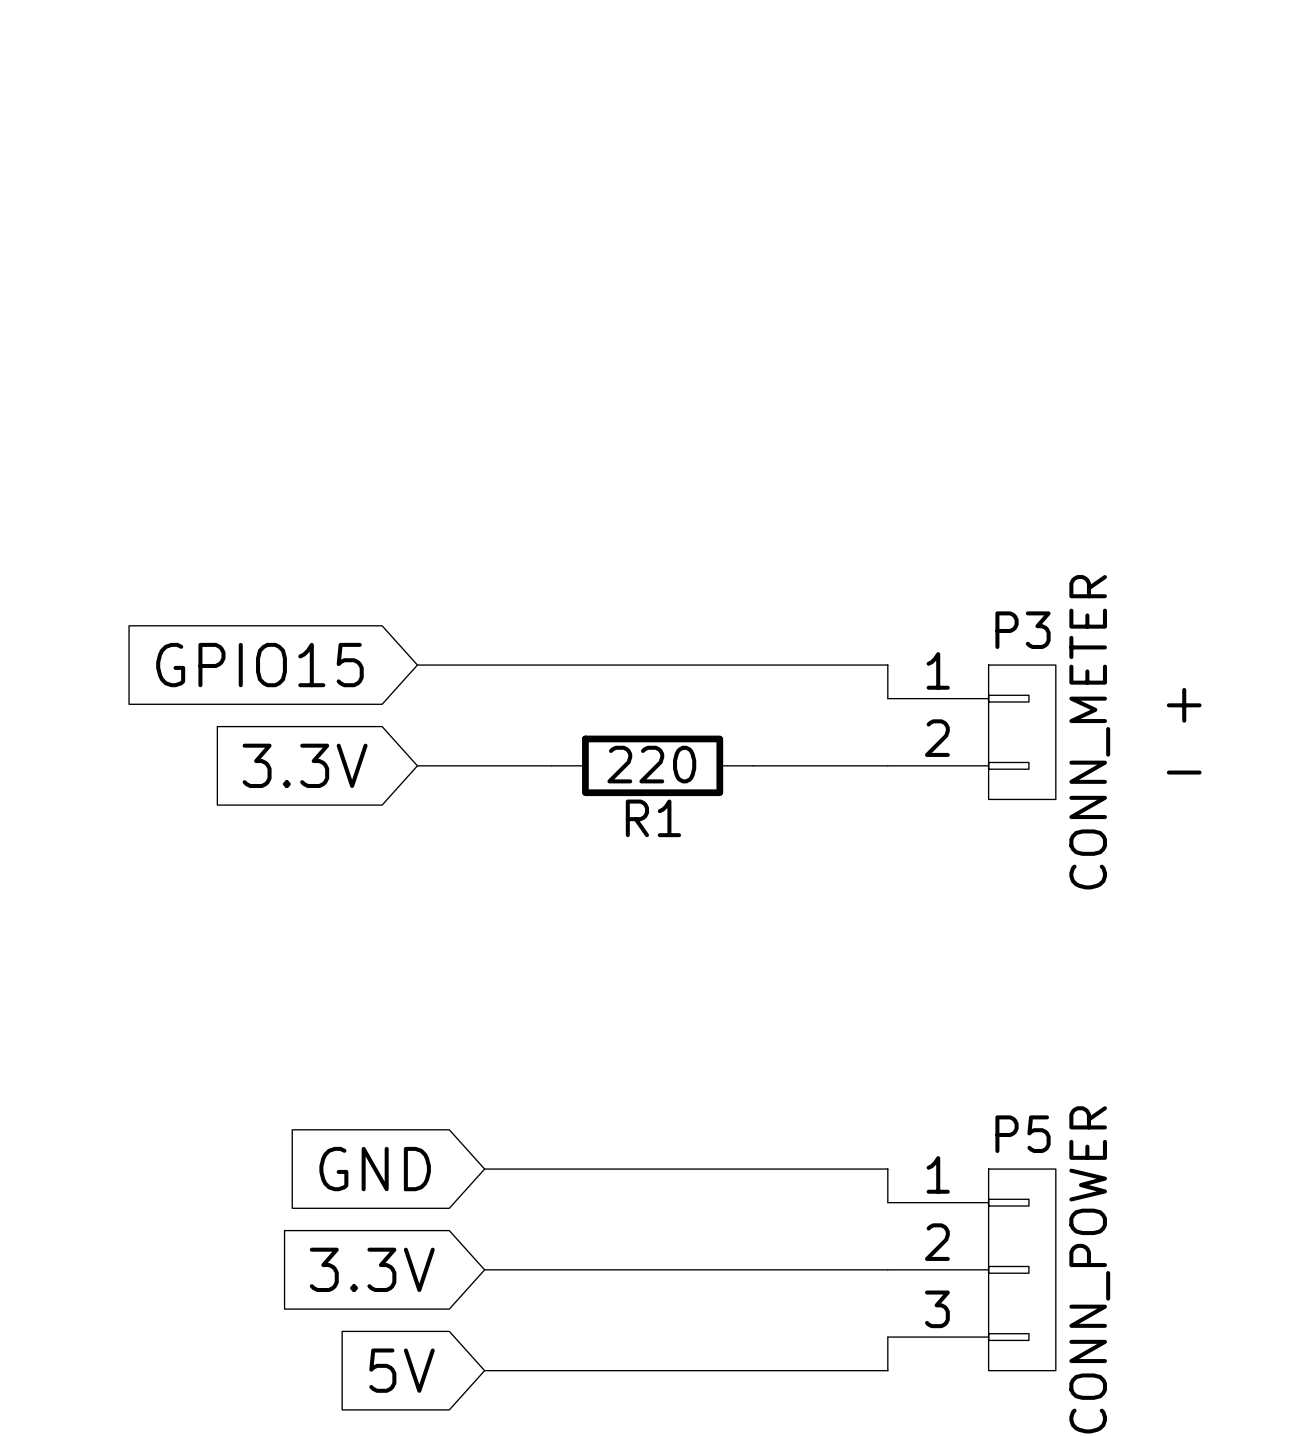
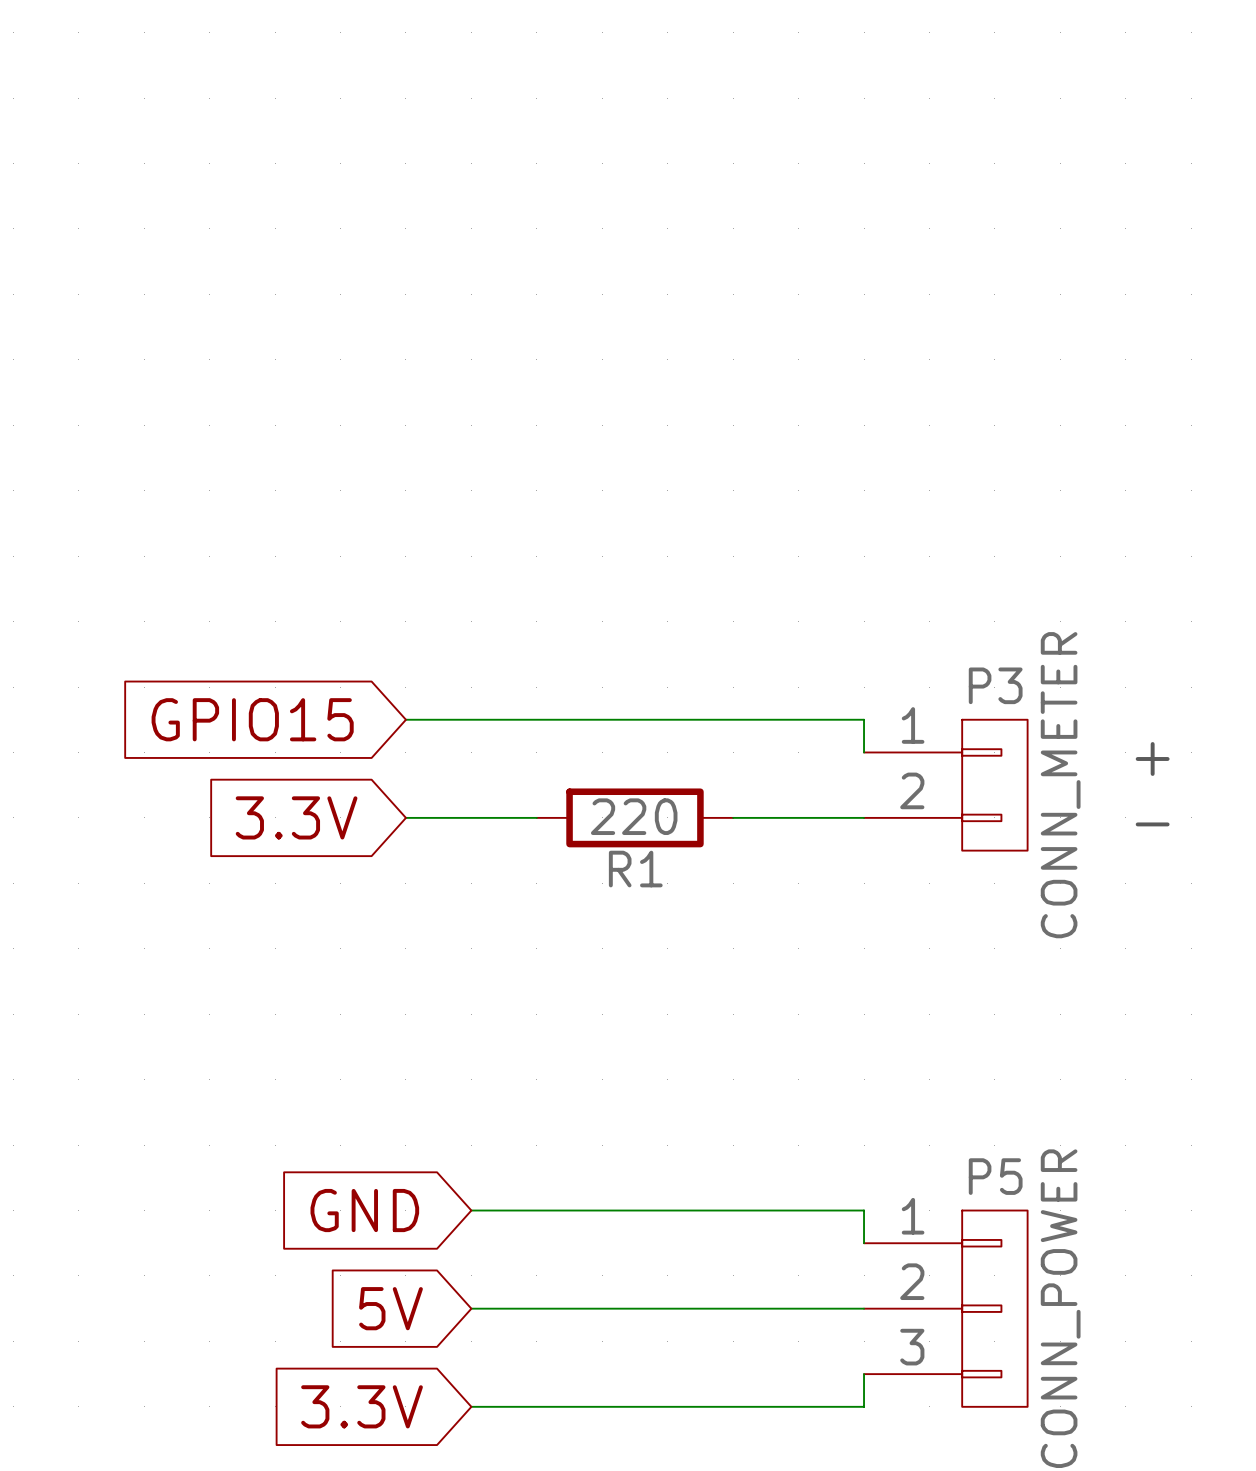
global label: 3.3V (372, 1269) -> 5V (390, 1308)
global label: 5V (402, 1370) -> 3.3V (362, 1406)

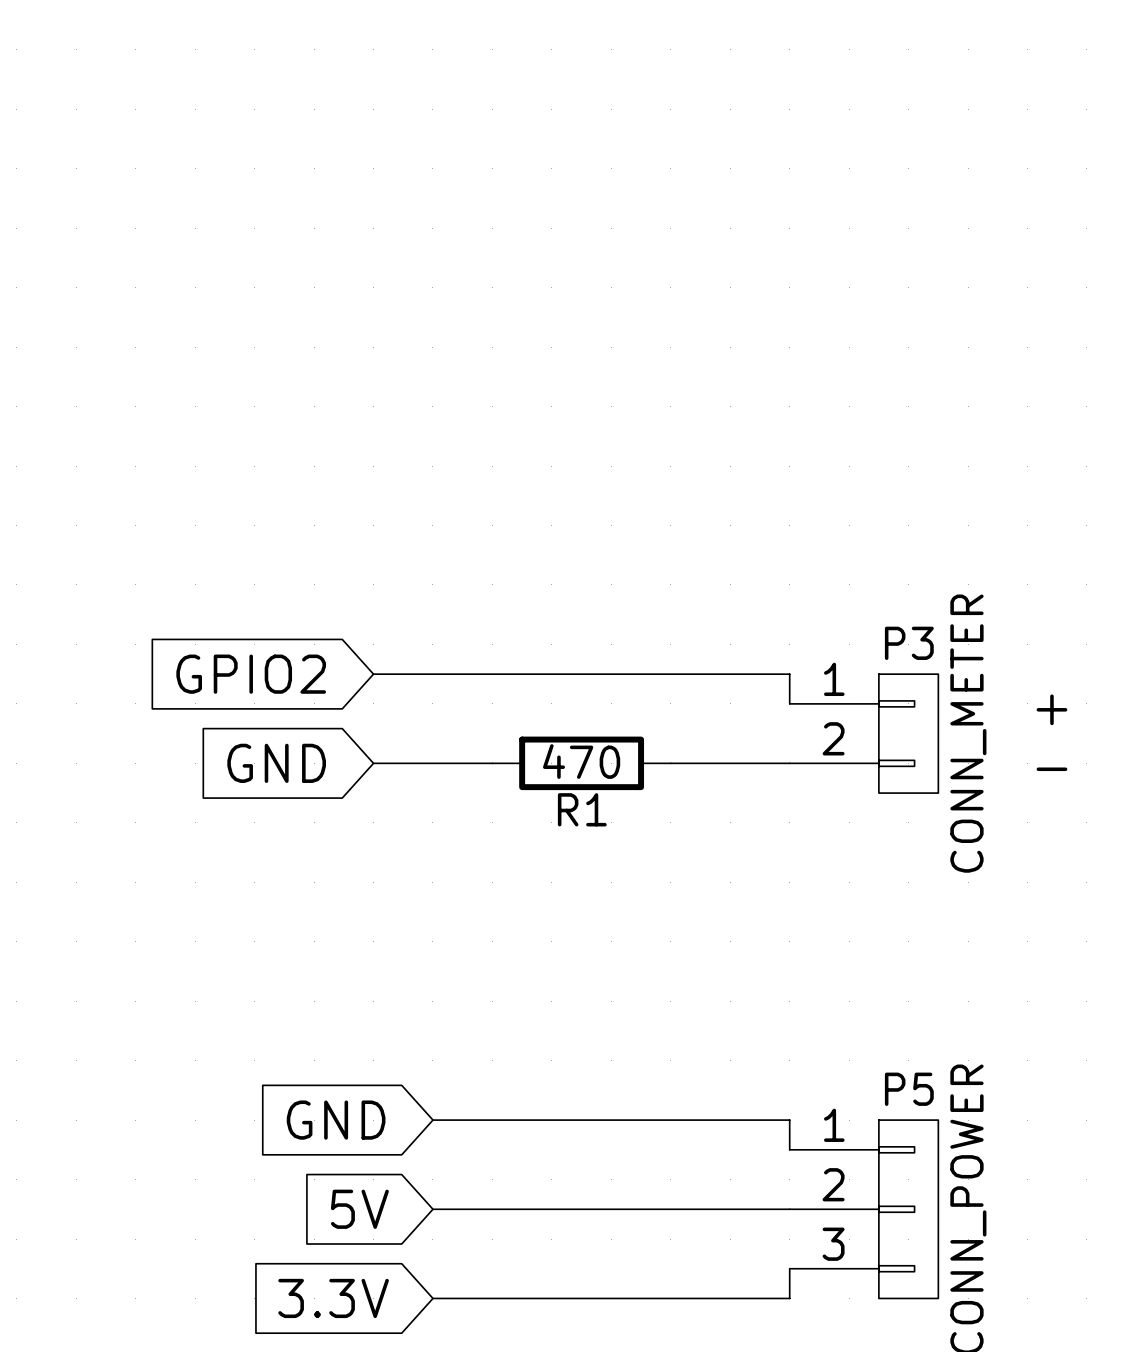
global label: GPIO15 (252, 719) -> GPIO2 (251, 674)
R1 value: 220 (634, 816) -> 470 (581, 761)
global label: 3.3V (296, 817) -> GND (276, 763)

